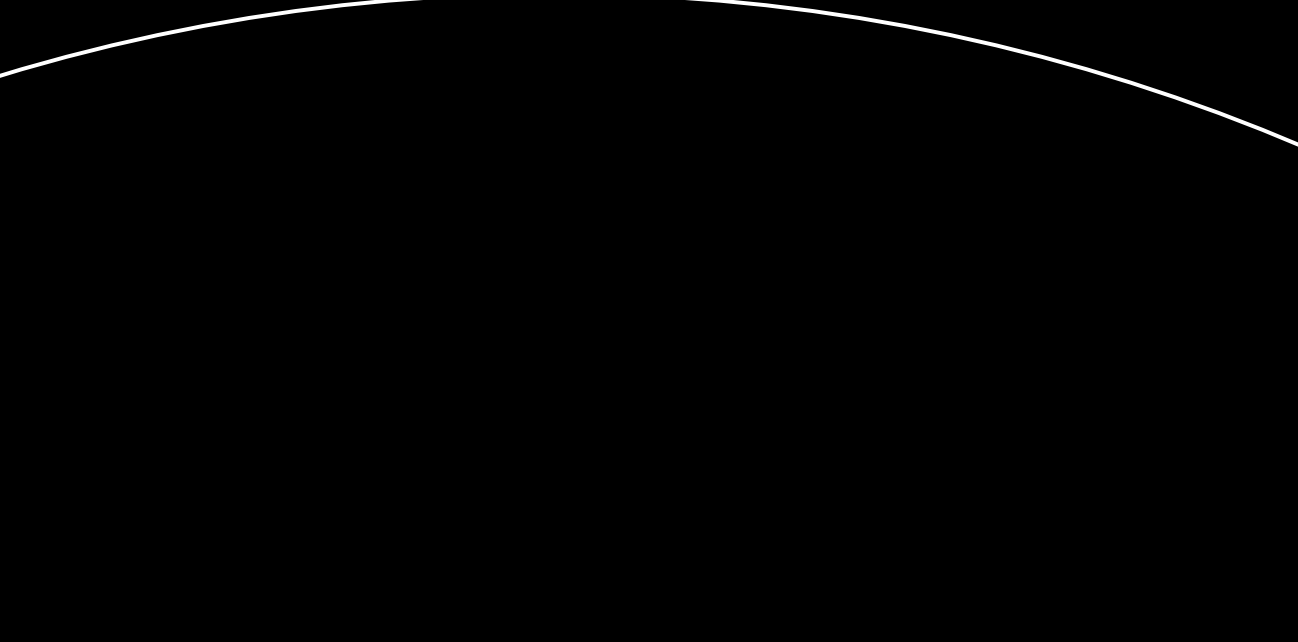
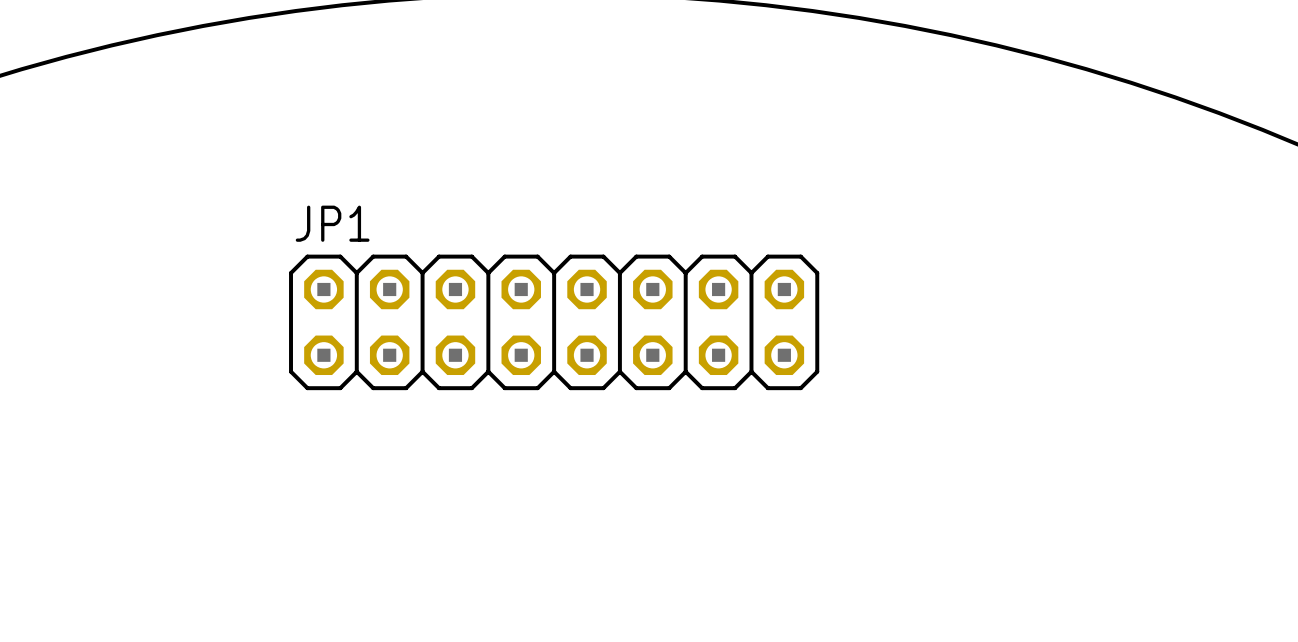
JP1: none -> (554, 322)

